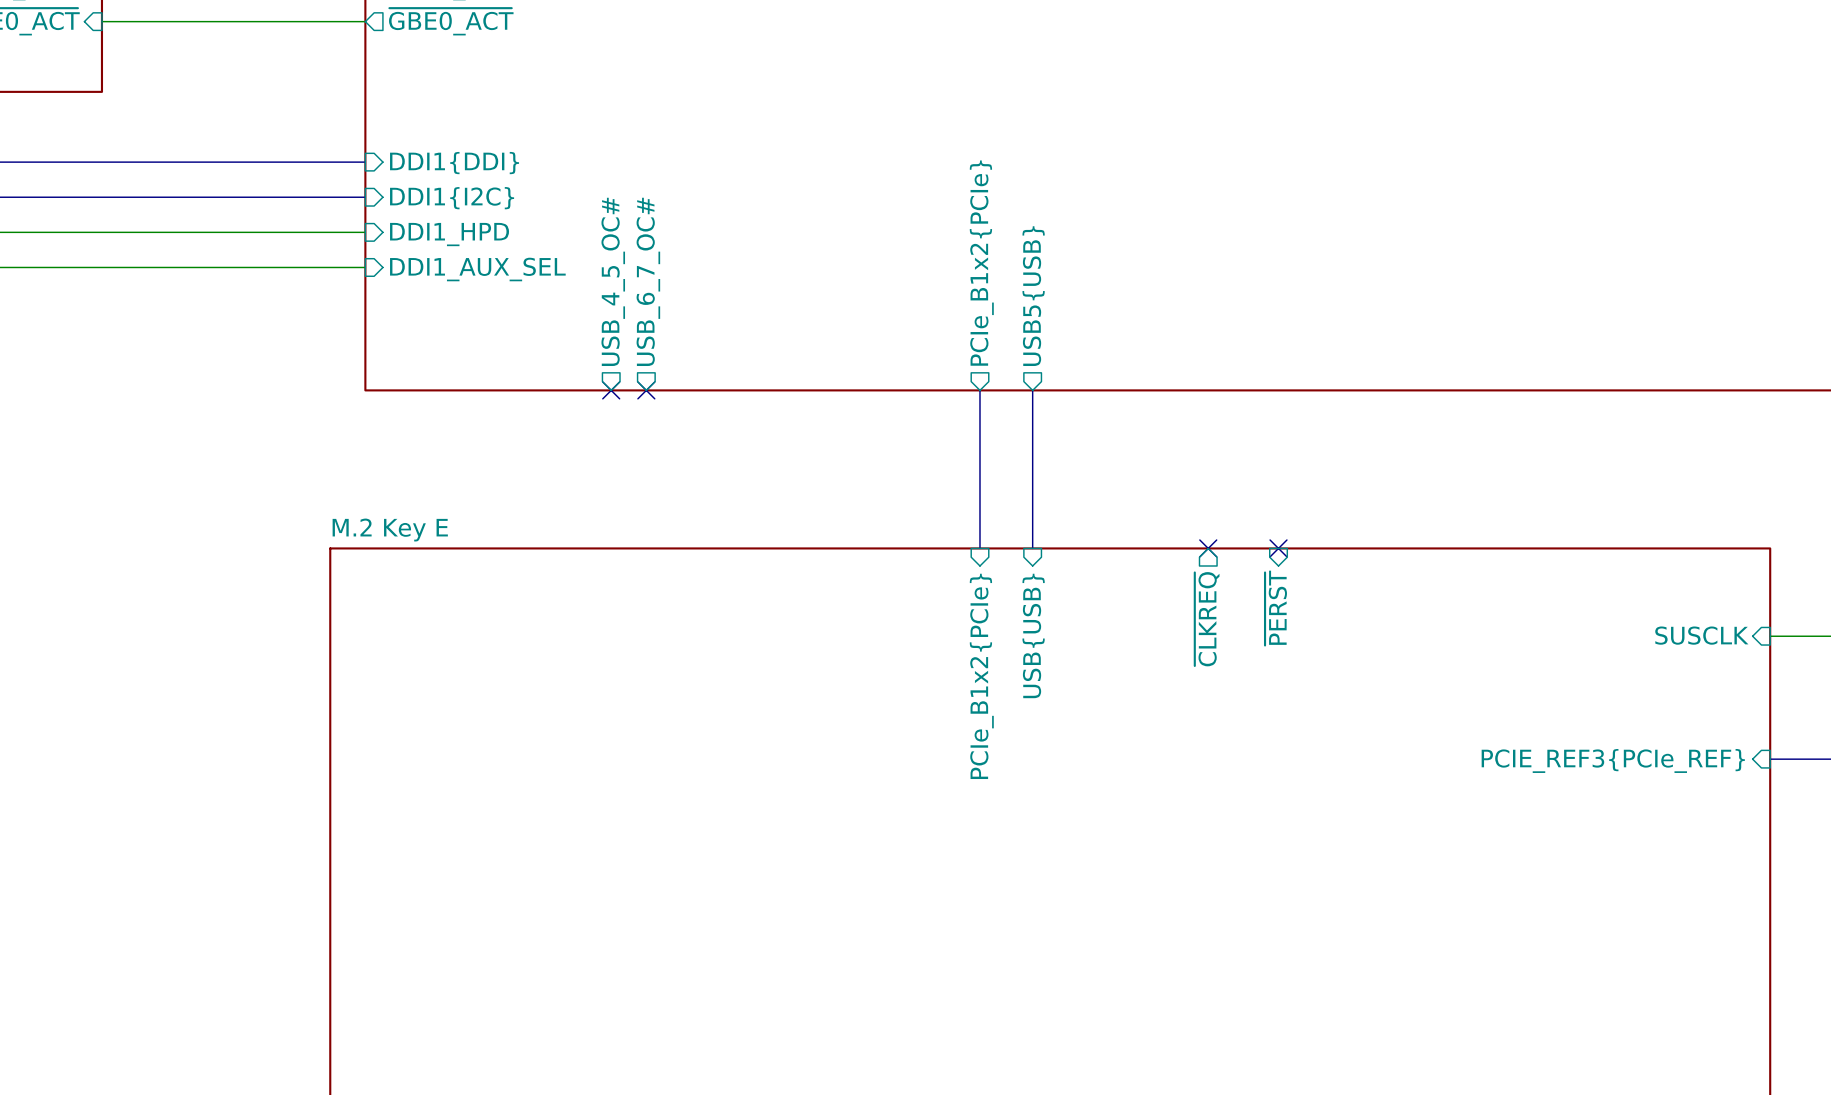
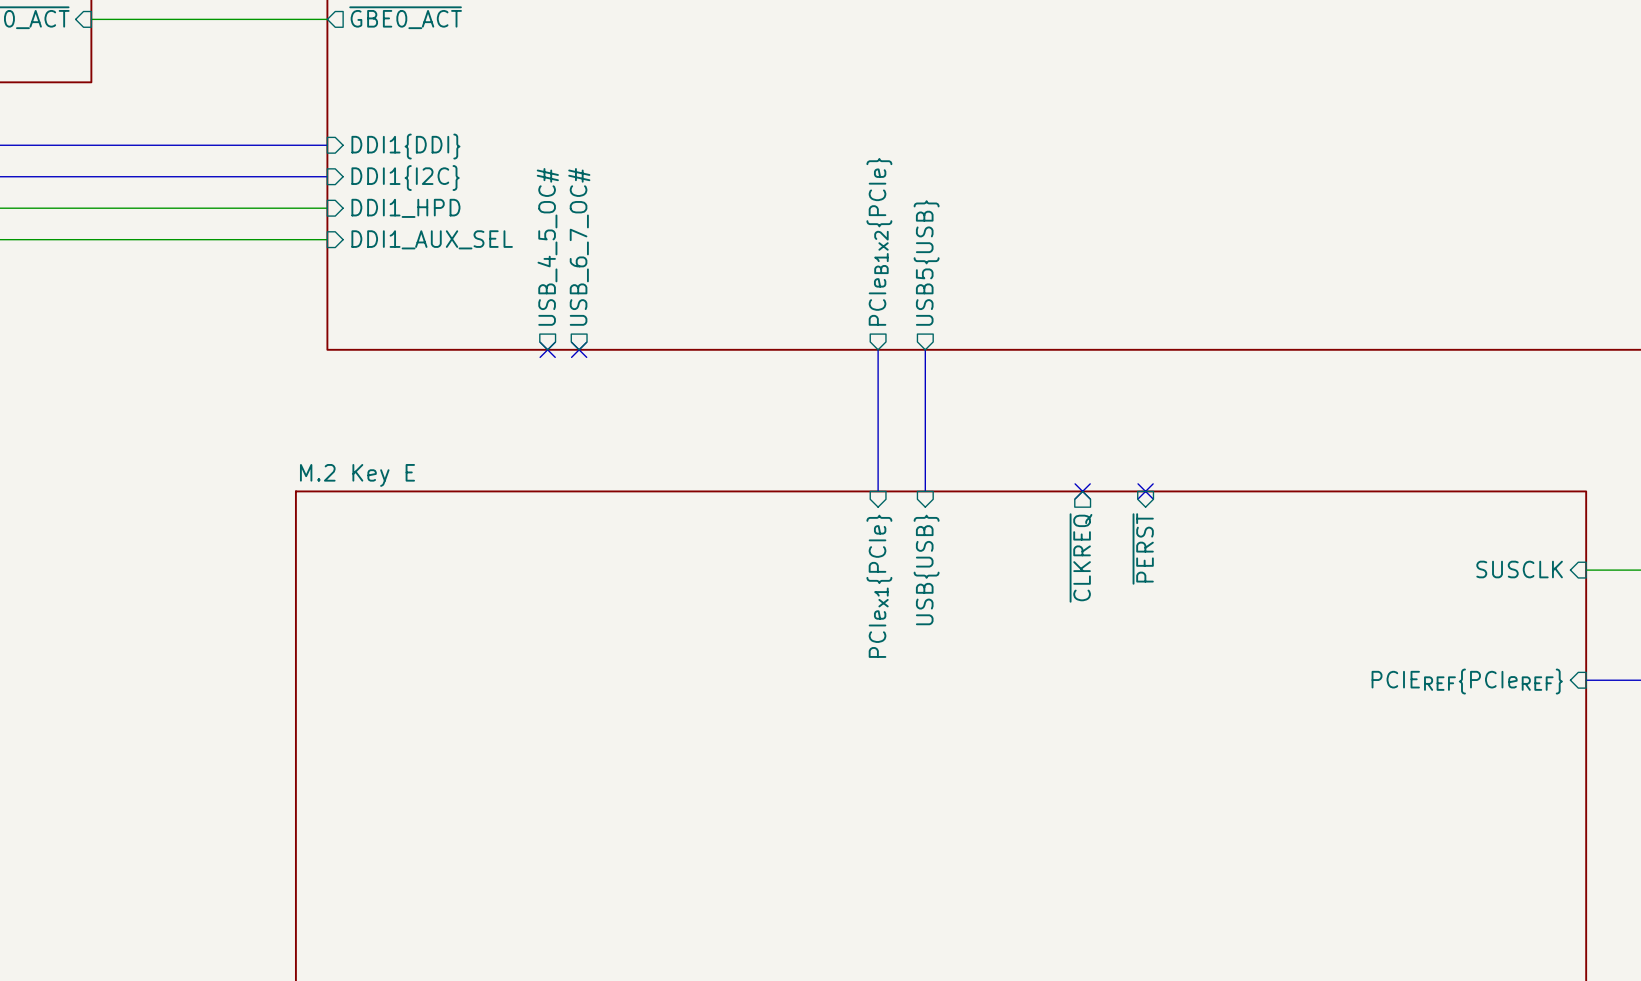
sheet pin: PCIe_B1x2{PCIe} (981, 263) -> PCIeB1x2{PCIe} (879, 241)
sheet pin: PCIe_B1x2{PCIe} (981, 676) -> PCIex1{PCIe} (879, 586)
sheet pin: PCIE_REF3{PCIe_REF} (1613, 760) -> PCIEREF{PCIeREF} (1467, 681)

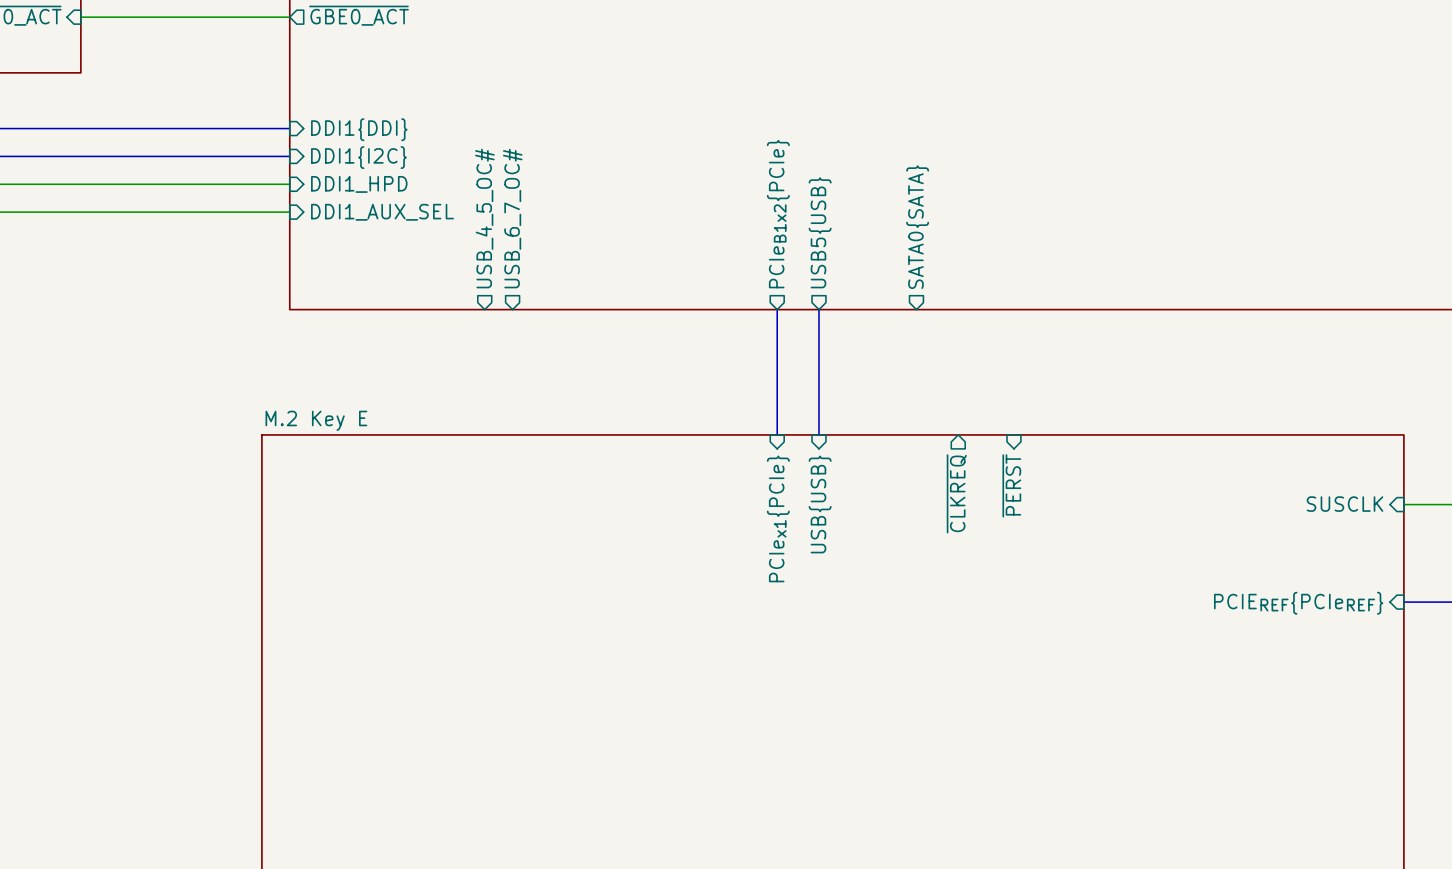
sheet pin: none -> SATA0{SATA} (917, 227)
no-connect mark: (547, 349) -> none
no-connect mark: (579, 349) -> none
no-connect mark: (1082, 491) -> none
no-connect mark: (1145, 491) -> none

